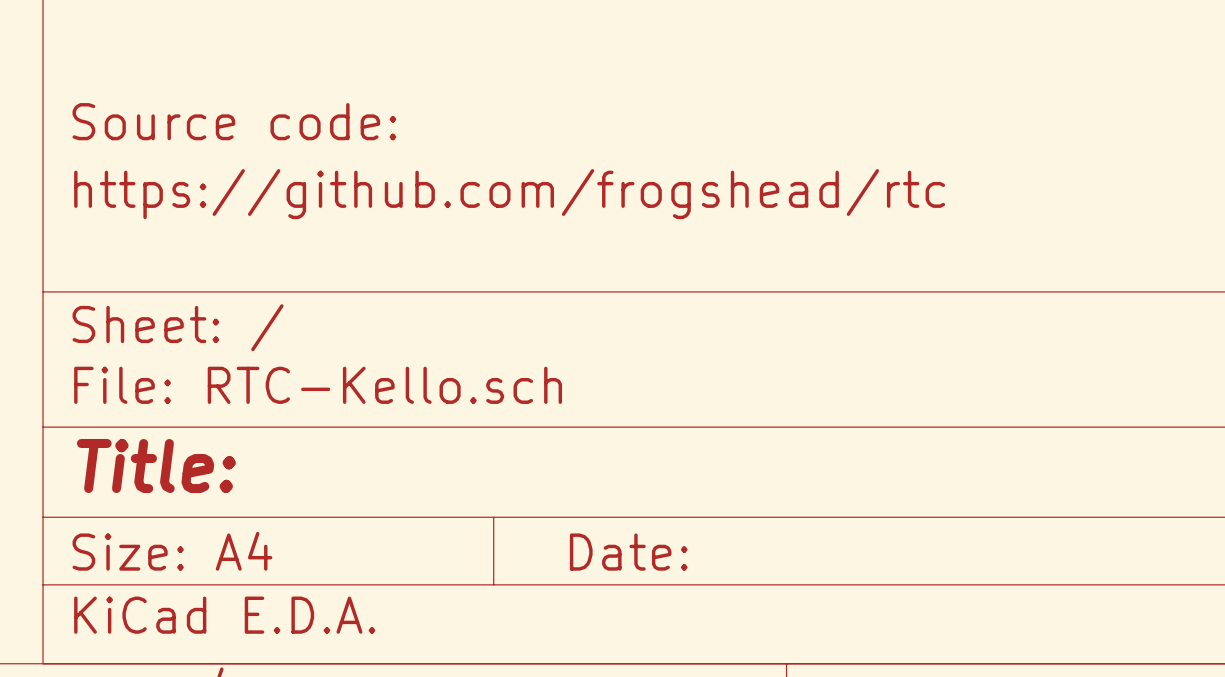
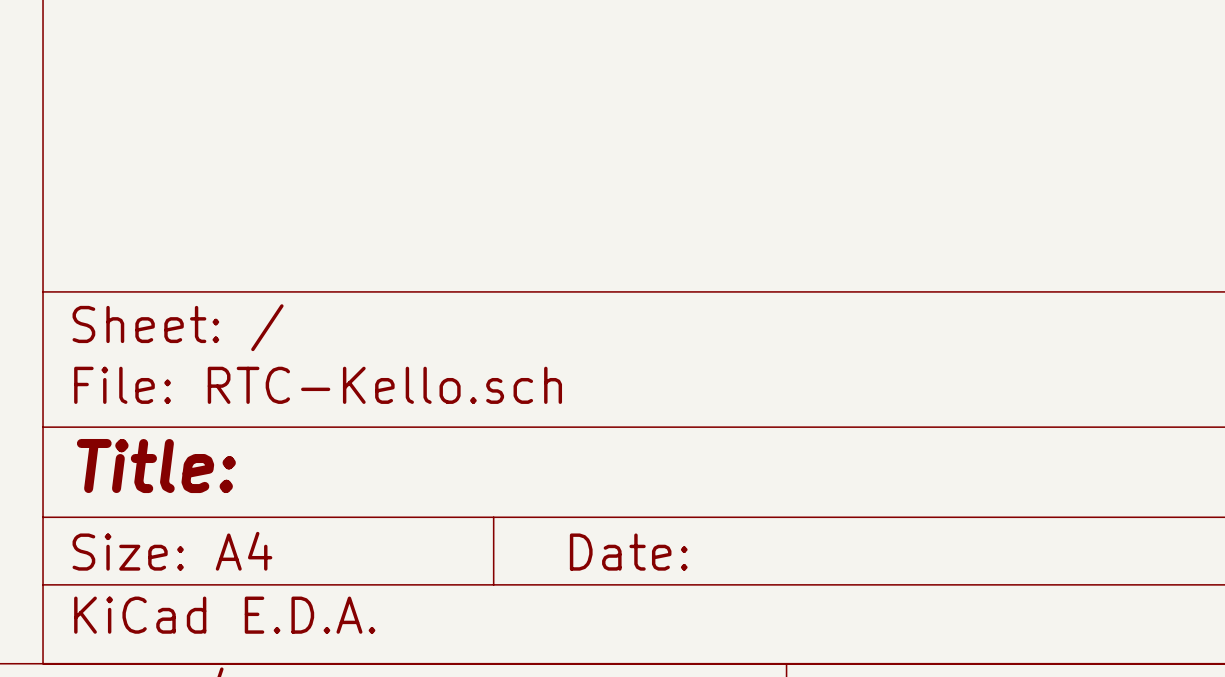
title block: Source code: (234, 121) -> none
title block: https://github.com/frogshead/rtc (509, 194) -> none

